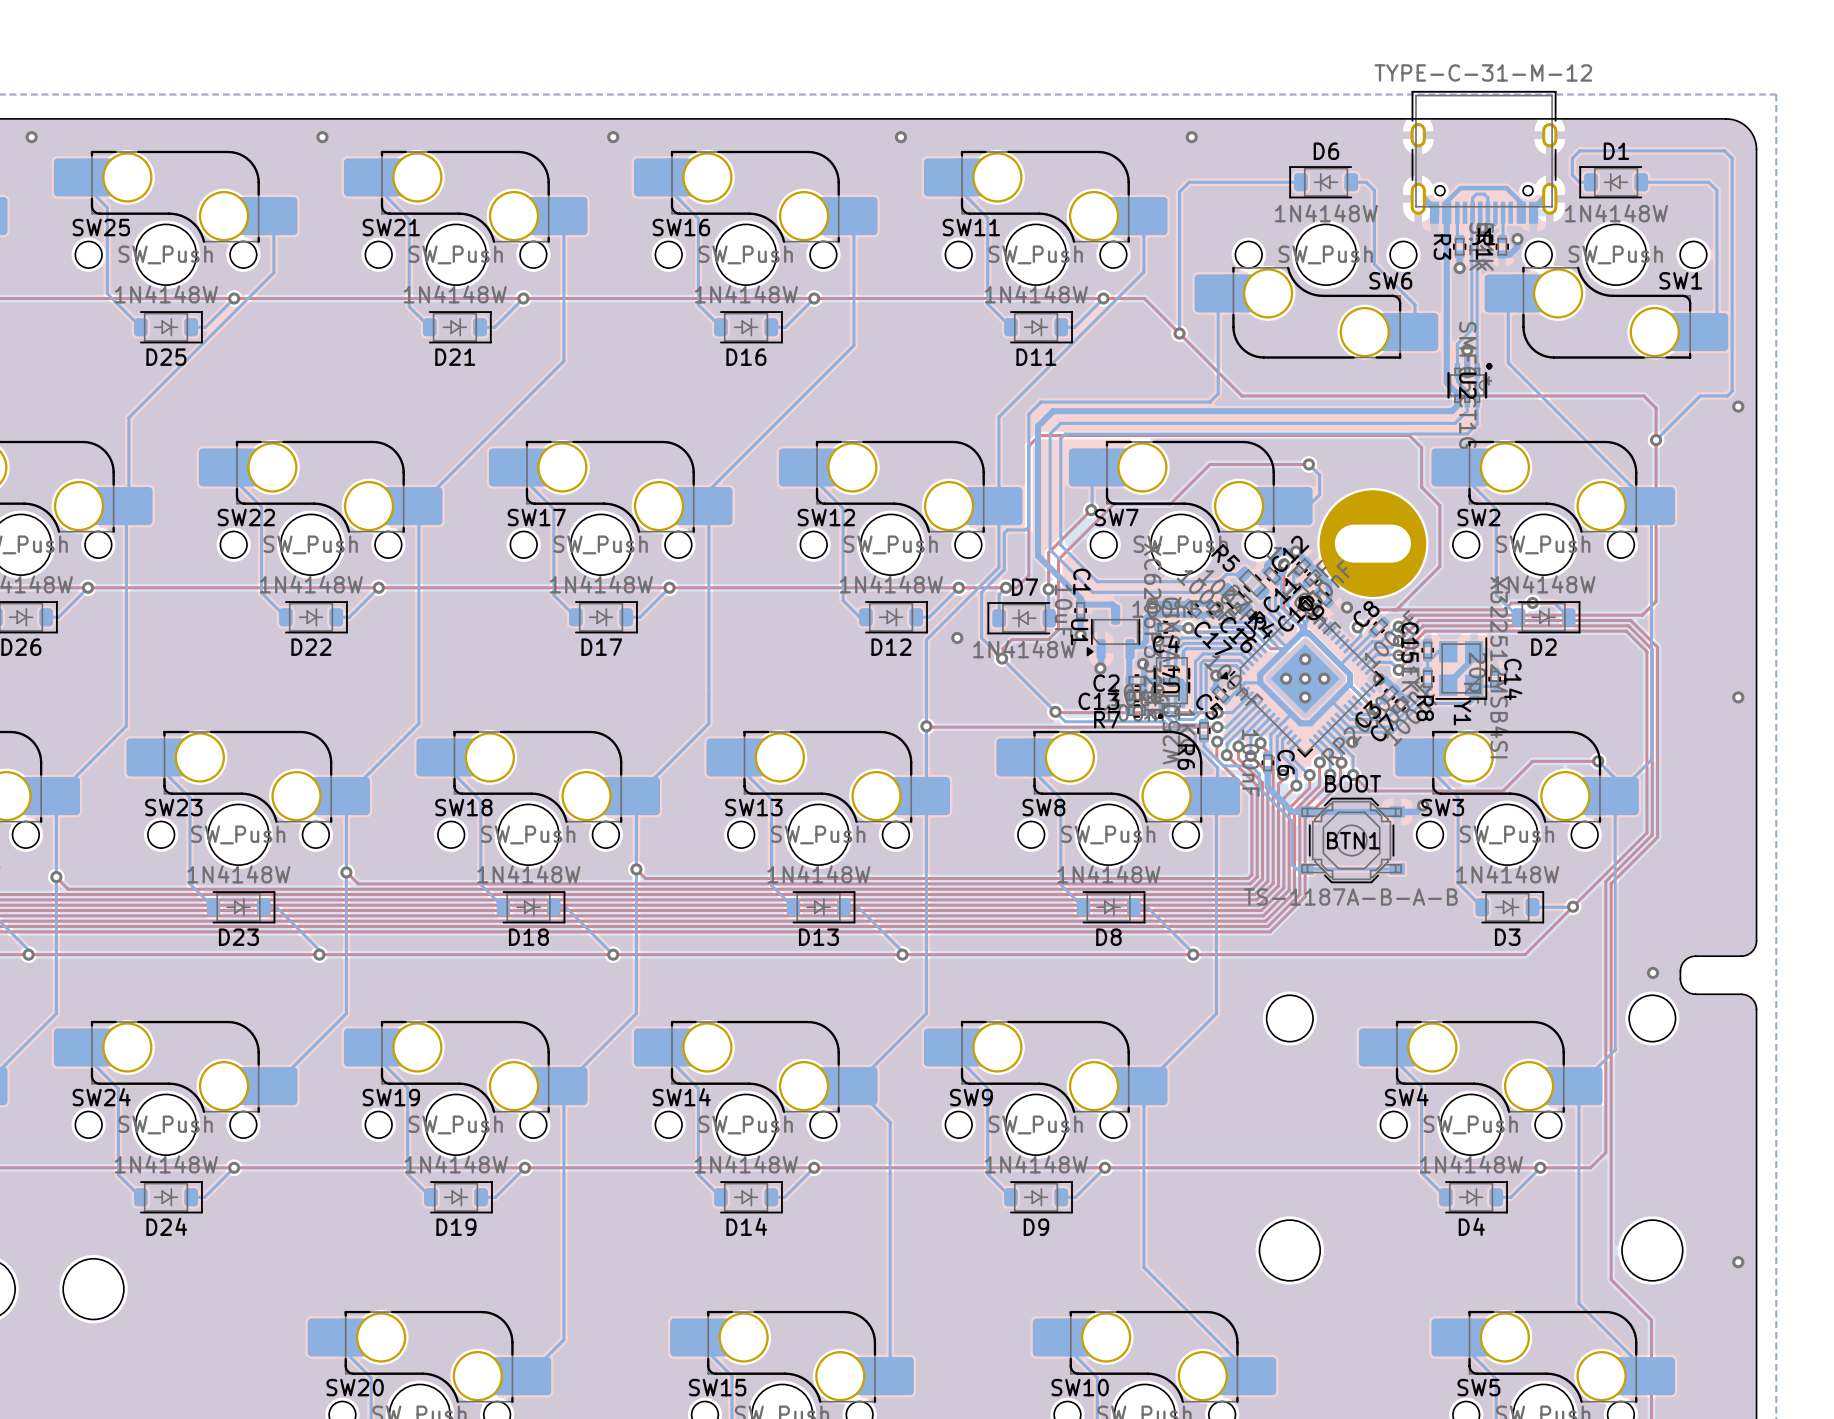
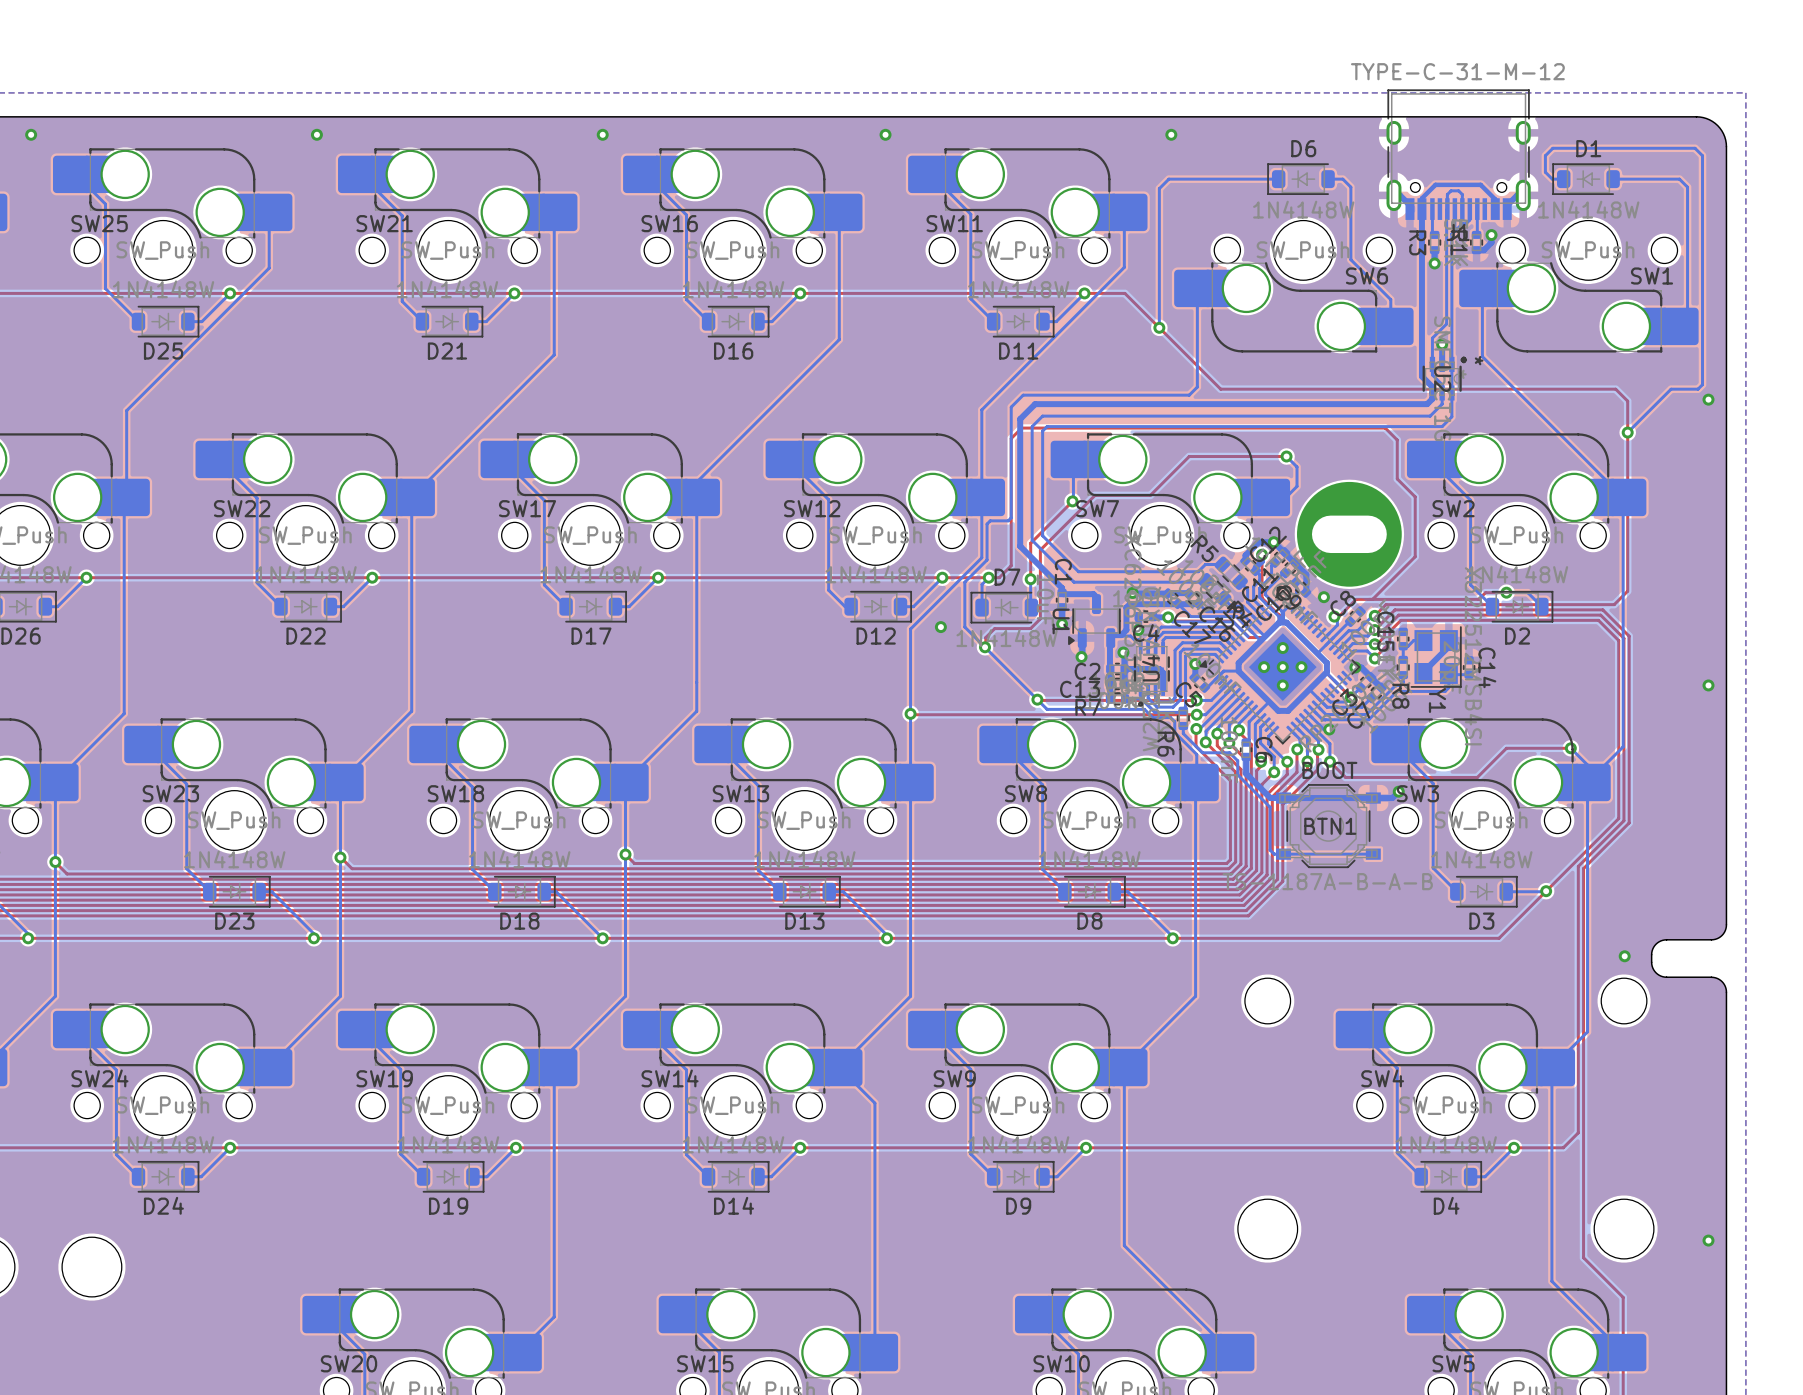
U2 text: none -> * (1479, 360)

